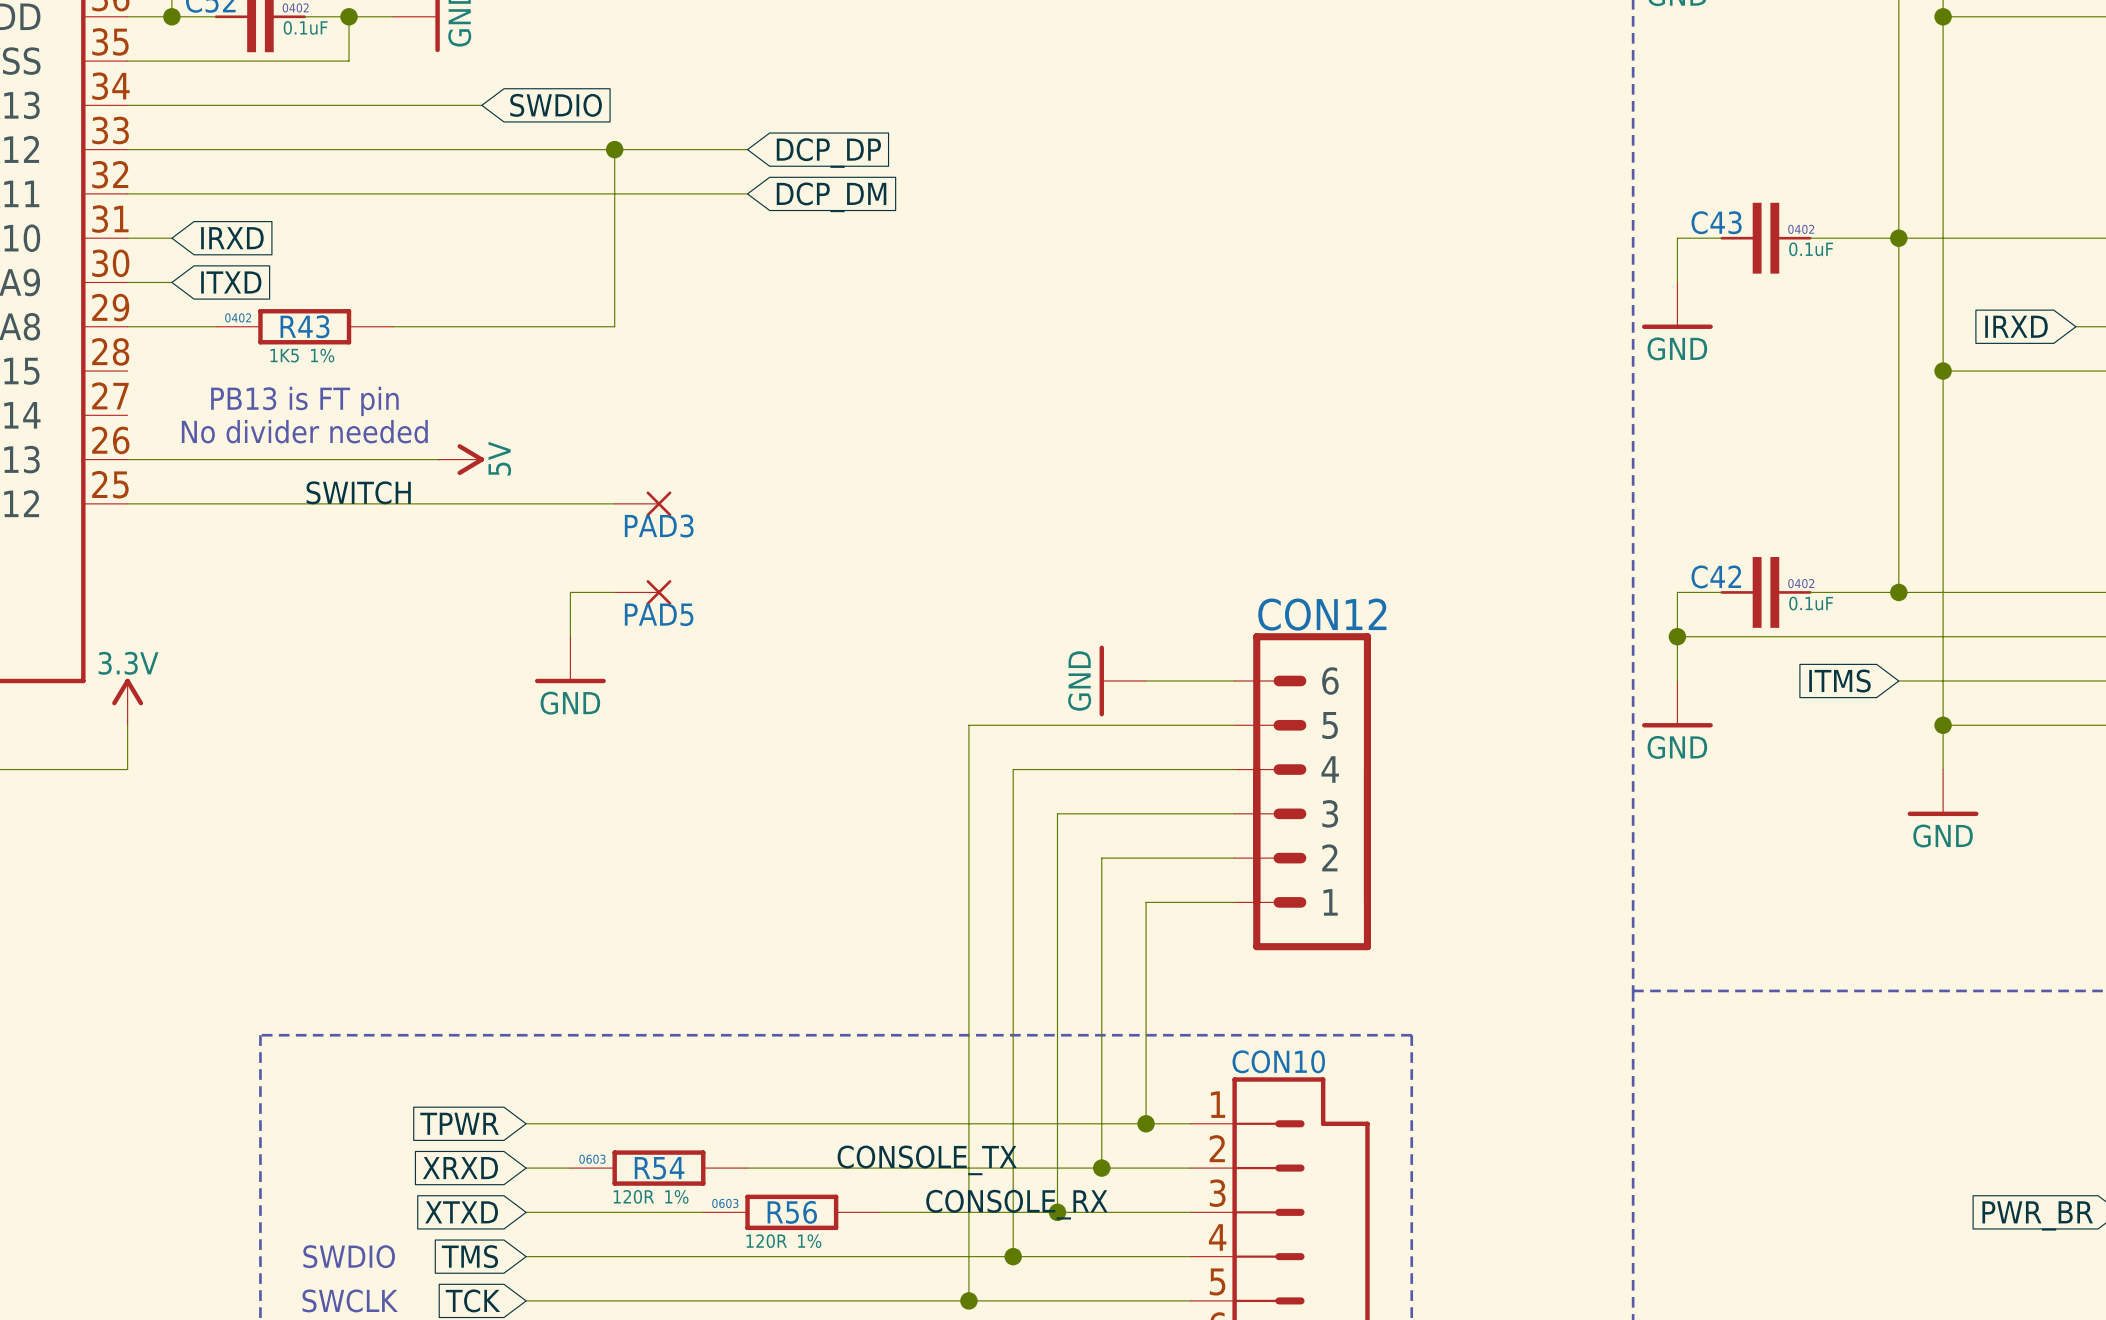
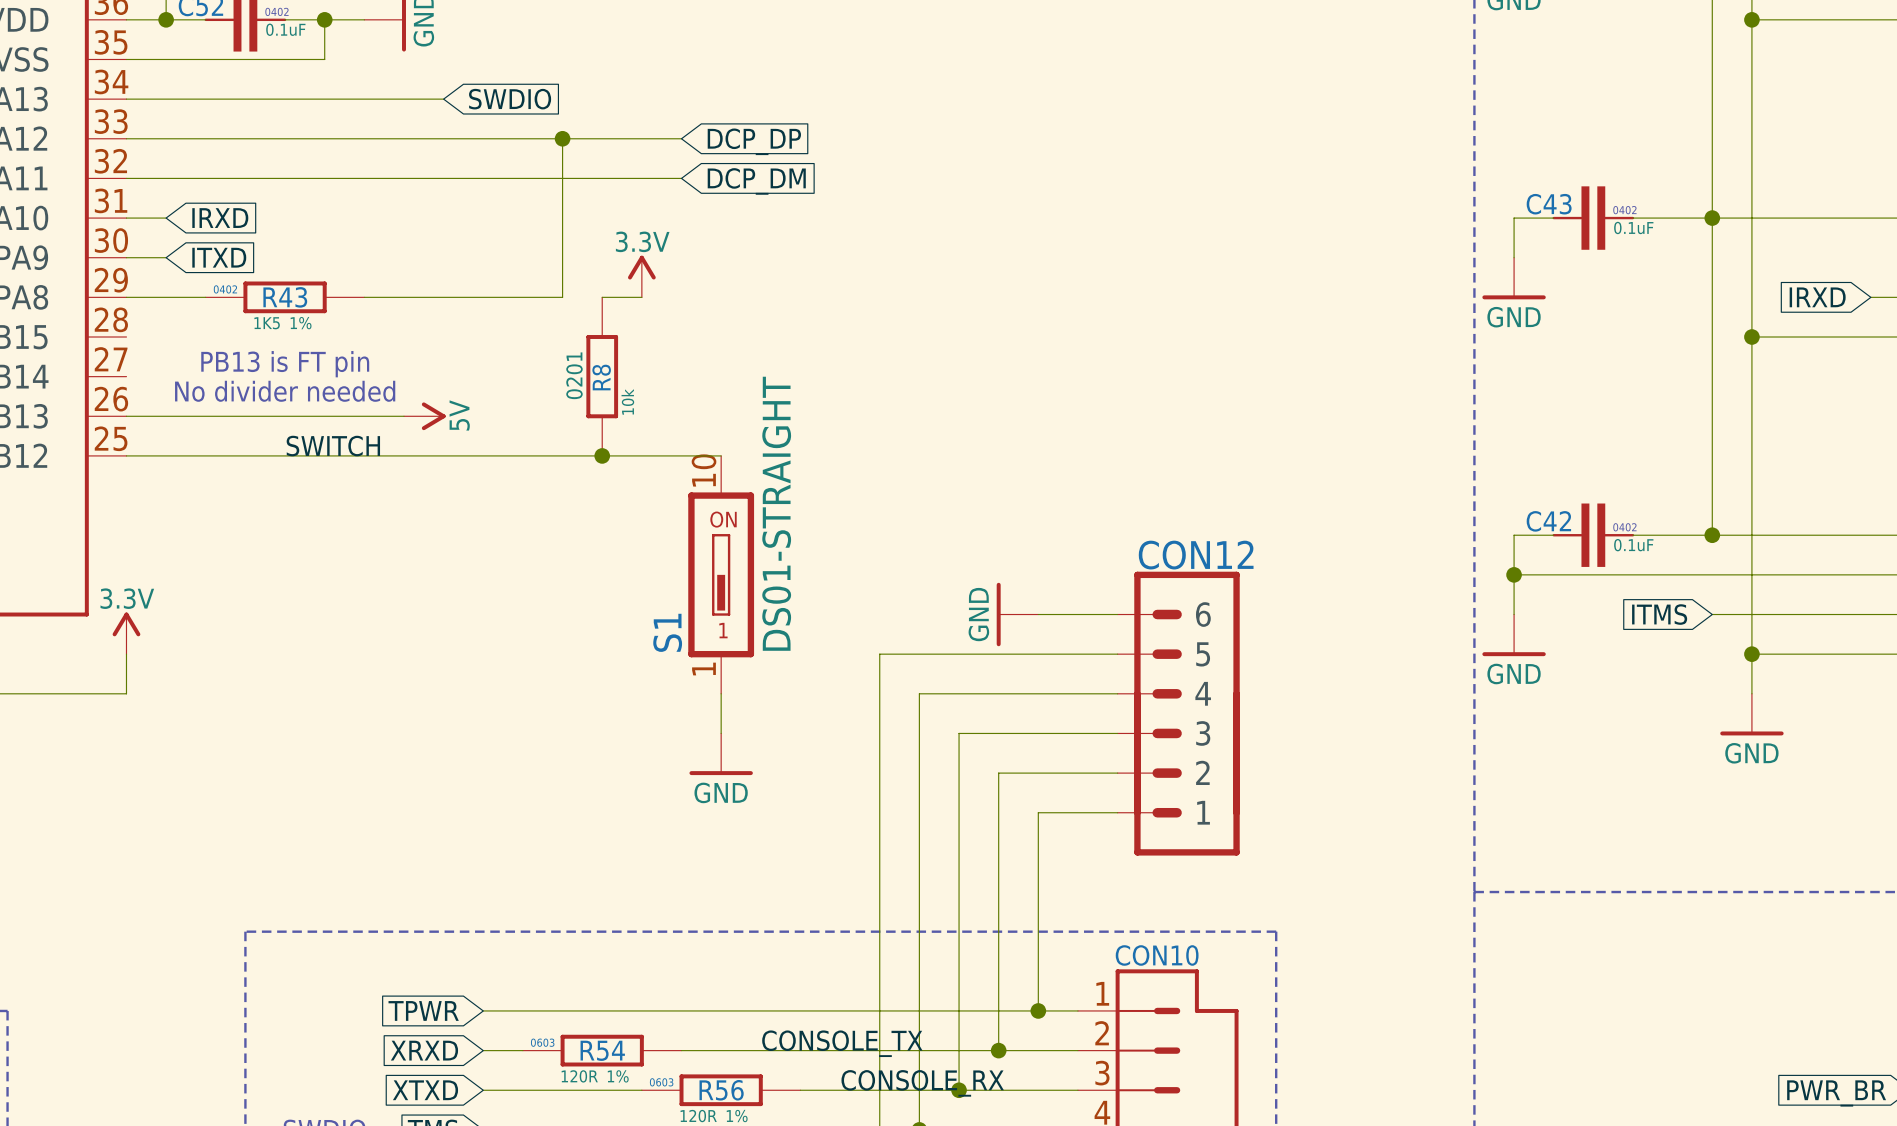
power symbol: none -> 3.3V (641, 276)
wire: none -> (602, 297) (641, 297)
R8: none -> 10k (602, 376)
wire: none -> (562, 455) (721, 455)
PAD3: (643, 503) -> none
junction: none -> (602, 455)
wire: (614, 592) (570, 592) (570, 636) -> none
PAD5: (643, 592) -> none
S1: none -> DS01-STRAIGHT (721, 574)
power symbol position: GND (570, 659) -> GND (721, 754)
wire: none -> (721, 693) (721, 733)

